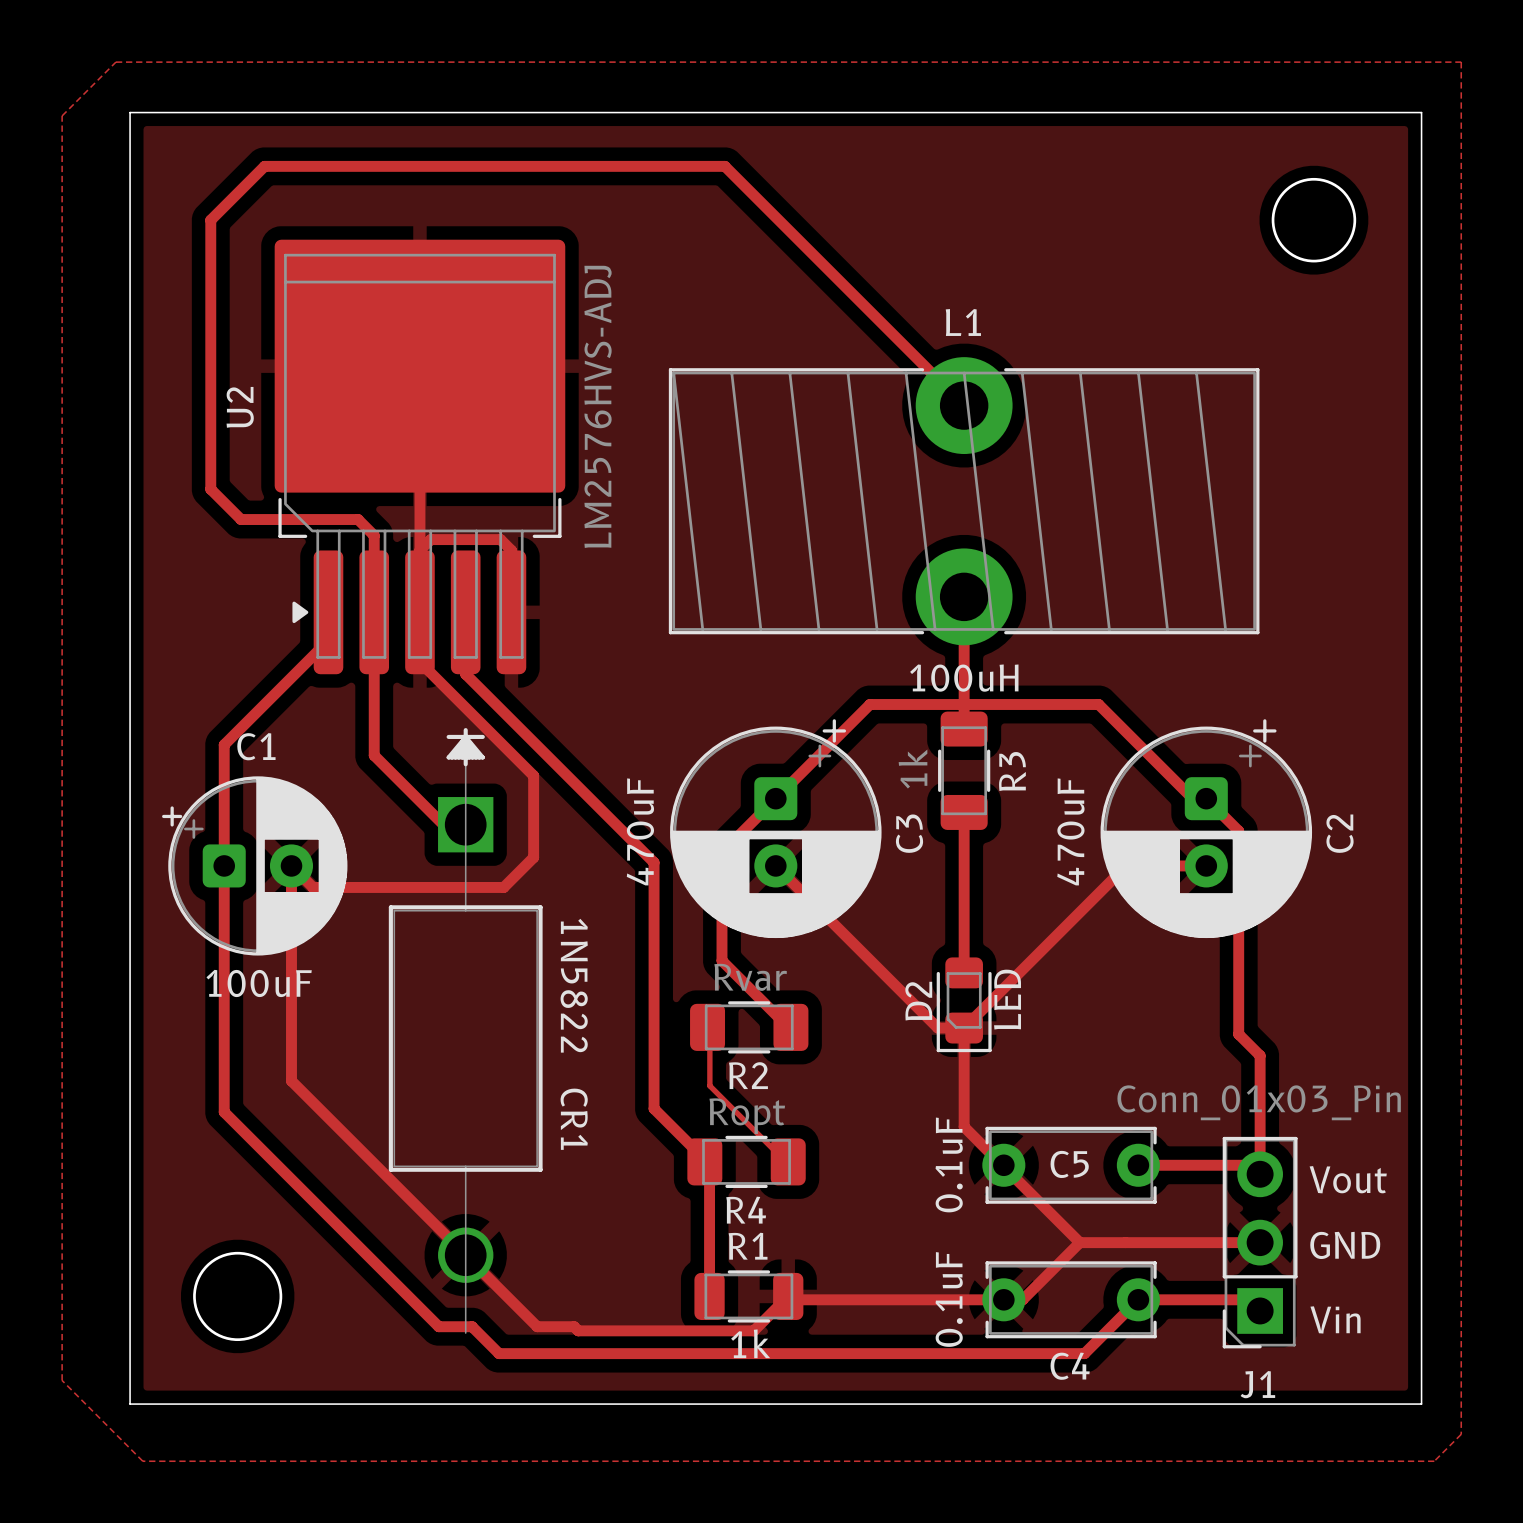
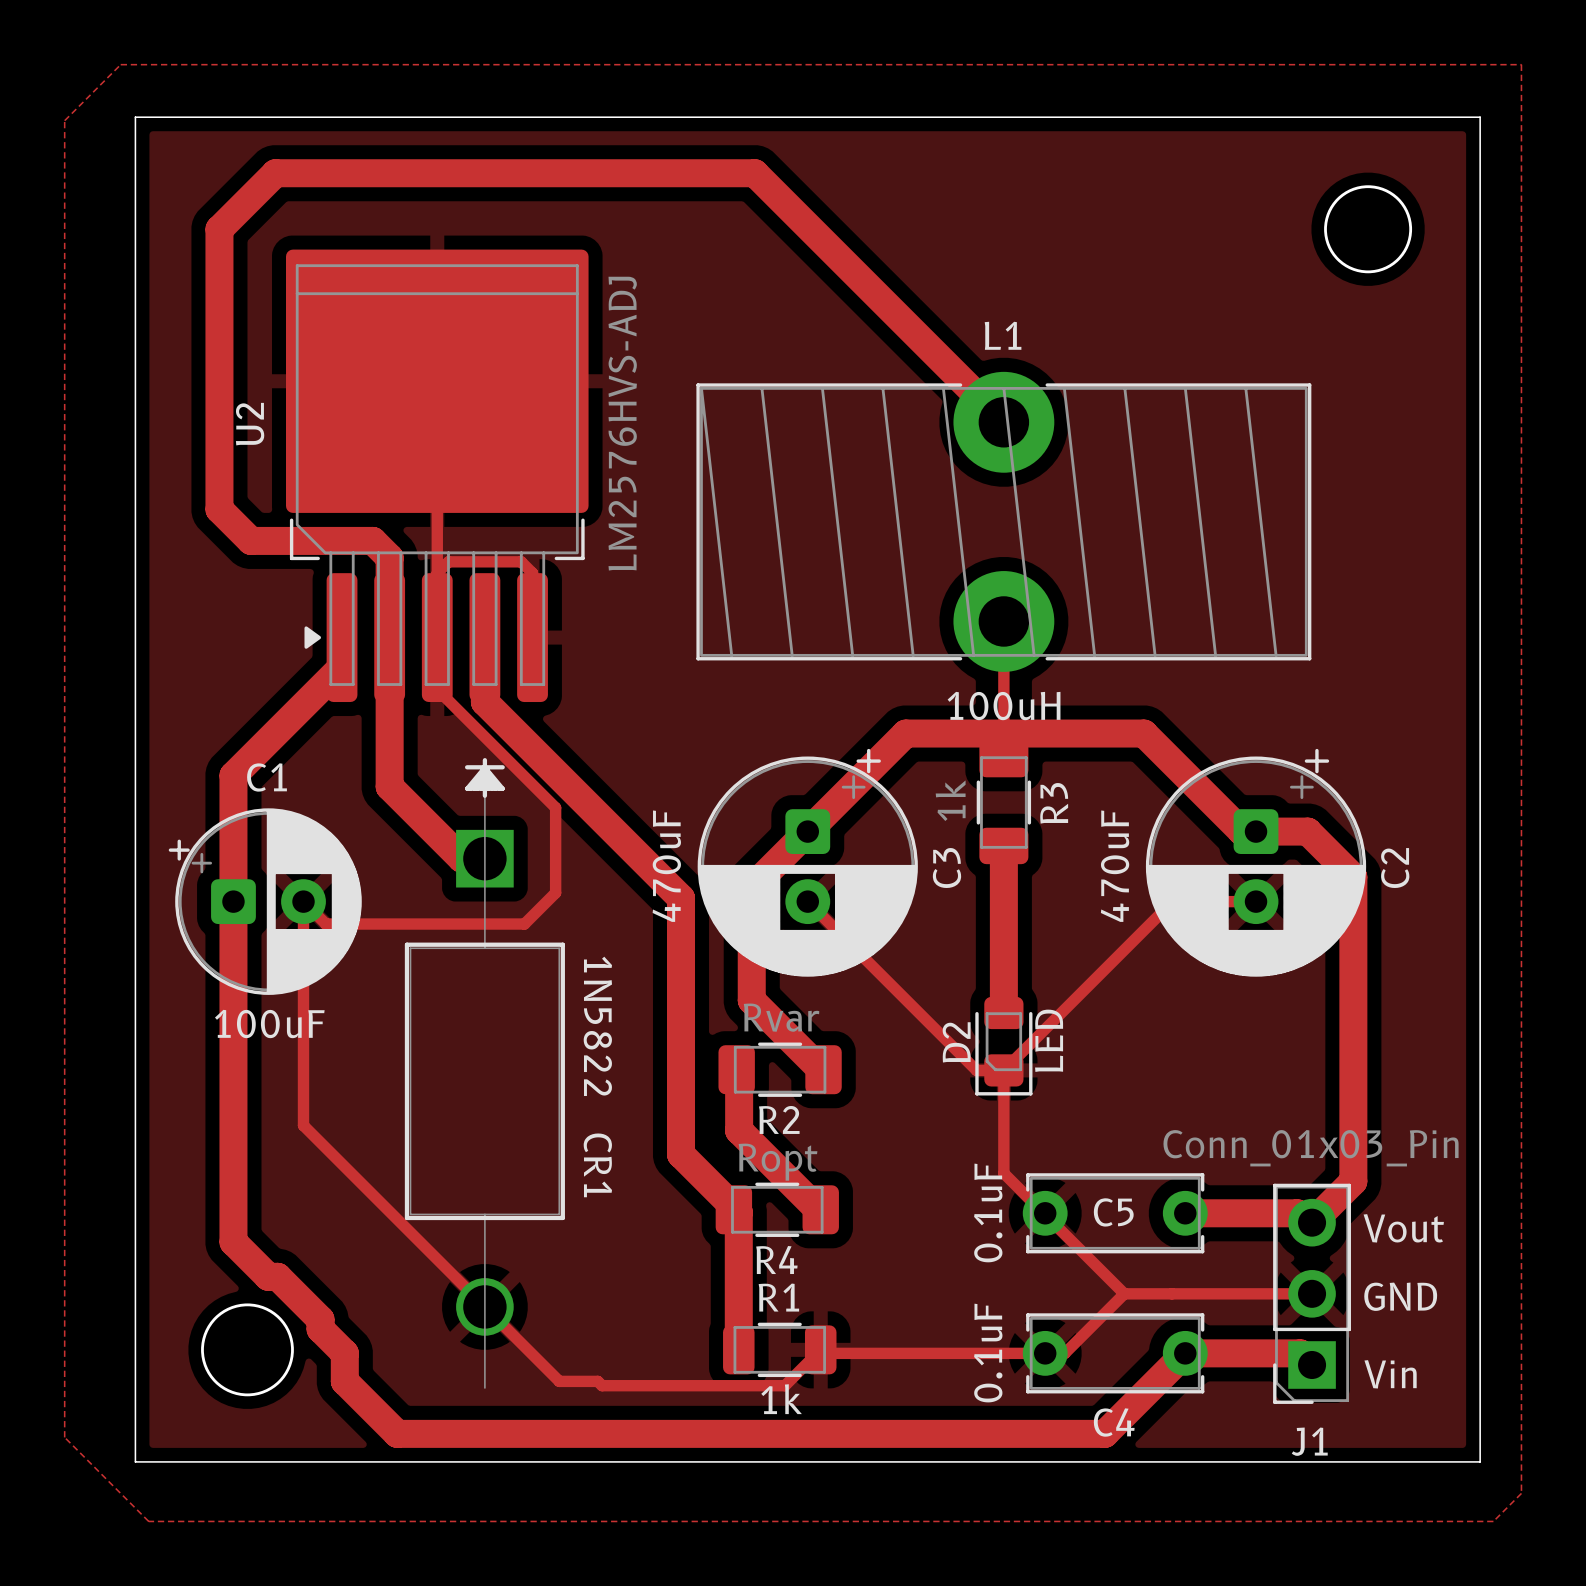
top track width: thin (964, 405) (724, 166) (264, 166) (210, 220) (210, 489) (241, 519) (358, 519) (374, 535) (374, 755) (443, 824) (465, 824) -> thick (1003, 422) (754, 173) (275, 173) (219, 229) (219, 509) (250, 540) (372, 540) (389, 557) (389, 786) (461, 858) (484, 858)
top track width: thin (465, 612) (465, 674) (654, 862) (654, 1108) (709, 1164) (709, 1296) -> thick (484, 637) (484, 702) (681, 898) (681, 1154) (738, 1212) (738, 1349)
top track width: thin (328, 640) (224, 744) (224, 1112) -> thick (342, 667) (233, 775) (233, 1157)
top track: (1206, 798) (1238, 831) (1238, 1034) (1260, 1055) (1260, 1174) -> (1256, 831) (1307, 831) (1353, 877) (1353, 1181) (1312, 1222)
top track width: thin (1206, 798) (1192, 798) (1098, 704) (869, 704) (721, 852) (721, 960) (788, 1027) -> thick (1256, 831) (1242, 831) (1143, 733) (905, 733) (751, 887) (751, 1000) (821, 1069)
top track width: thin (964, 810) (964, 972) -> thick (1003, 843) (1003, 1012)
top track width: thin (709, 1027) (709, 1085) (785, 1161) -> thick (739, 1069) (739, 1130) (818, 1209)
top track: (224, 1112) (438, 1326) (472, 1326) (499, 1353) (1084, 1353) -> (233, 1157) (233, 1242) (268, 1276) (277, 1276) (320, 1319) (320, 1329) (344, 1353) (344, 1381) (397, 1433) (1104, 1433) (1129, 1409)
top track width: thin (1138, 1165) (1245, 1165) (1255, 1174) (1260, 1174) -> thick (1185, 1213) (1297, 1213) (1306, 1222) (1312, 1222)
top track width: thin (1260, 1310) (1248, 1299) (1138, 1299) (1084, 1353) -> thick (1312, 1364) (1300, 1353) (1185, 1353) (1129, 1409)

